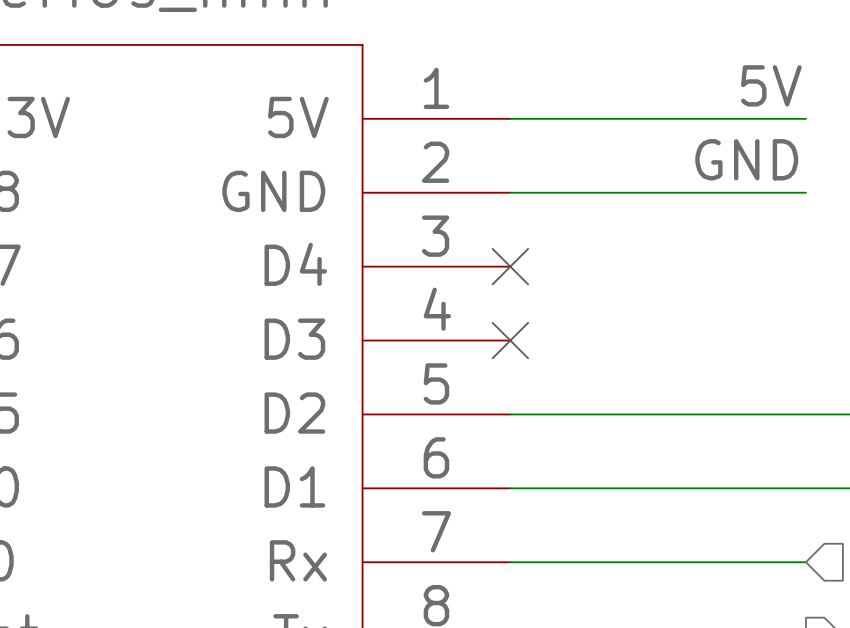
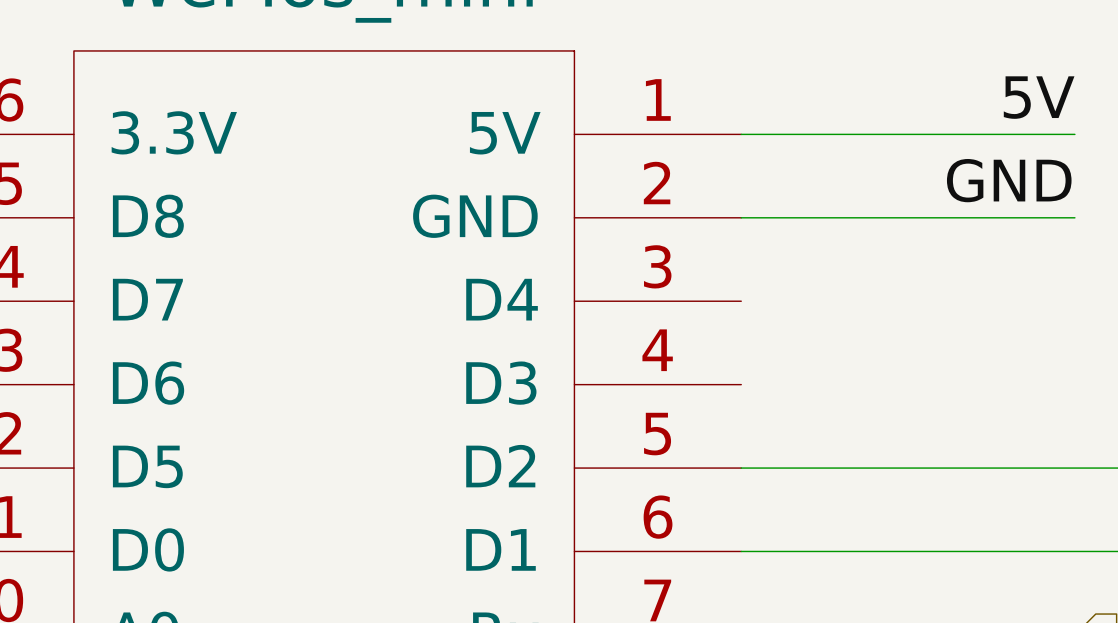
no-connect mark: (510, 266) -> none
no-connect mark: (510, 340) -> none

